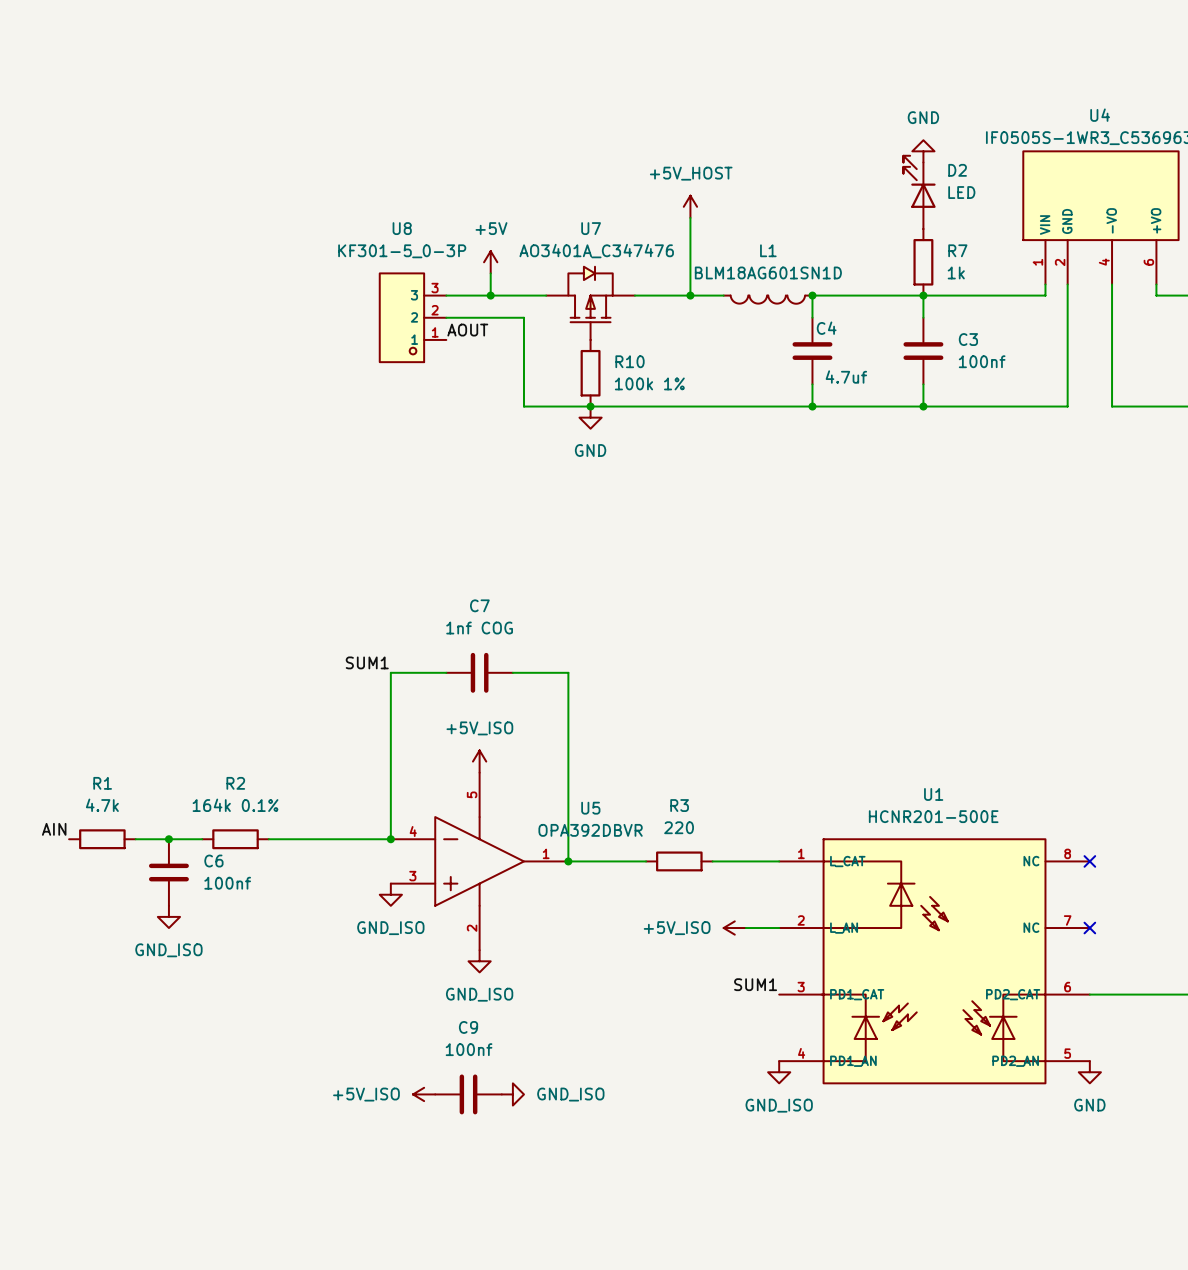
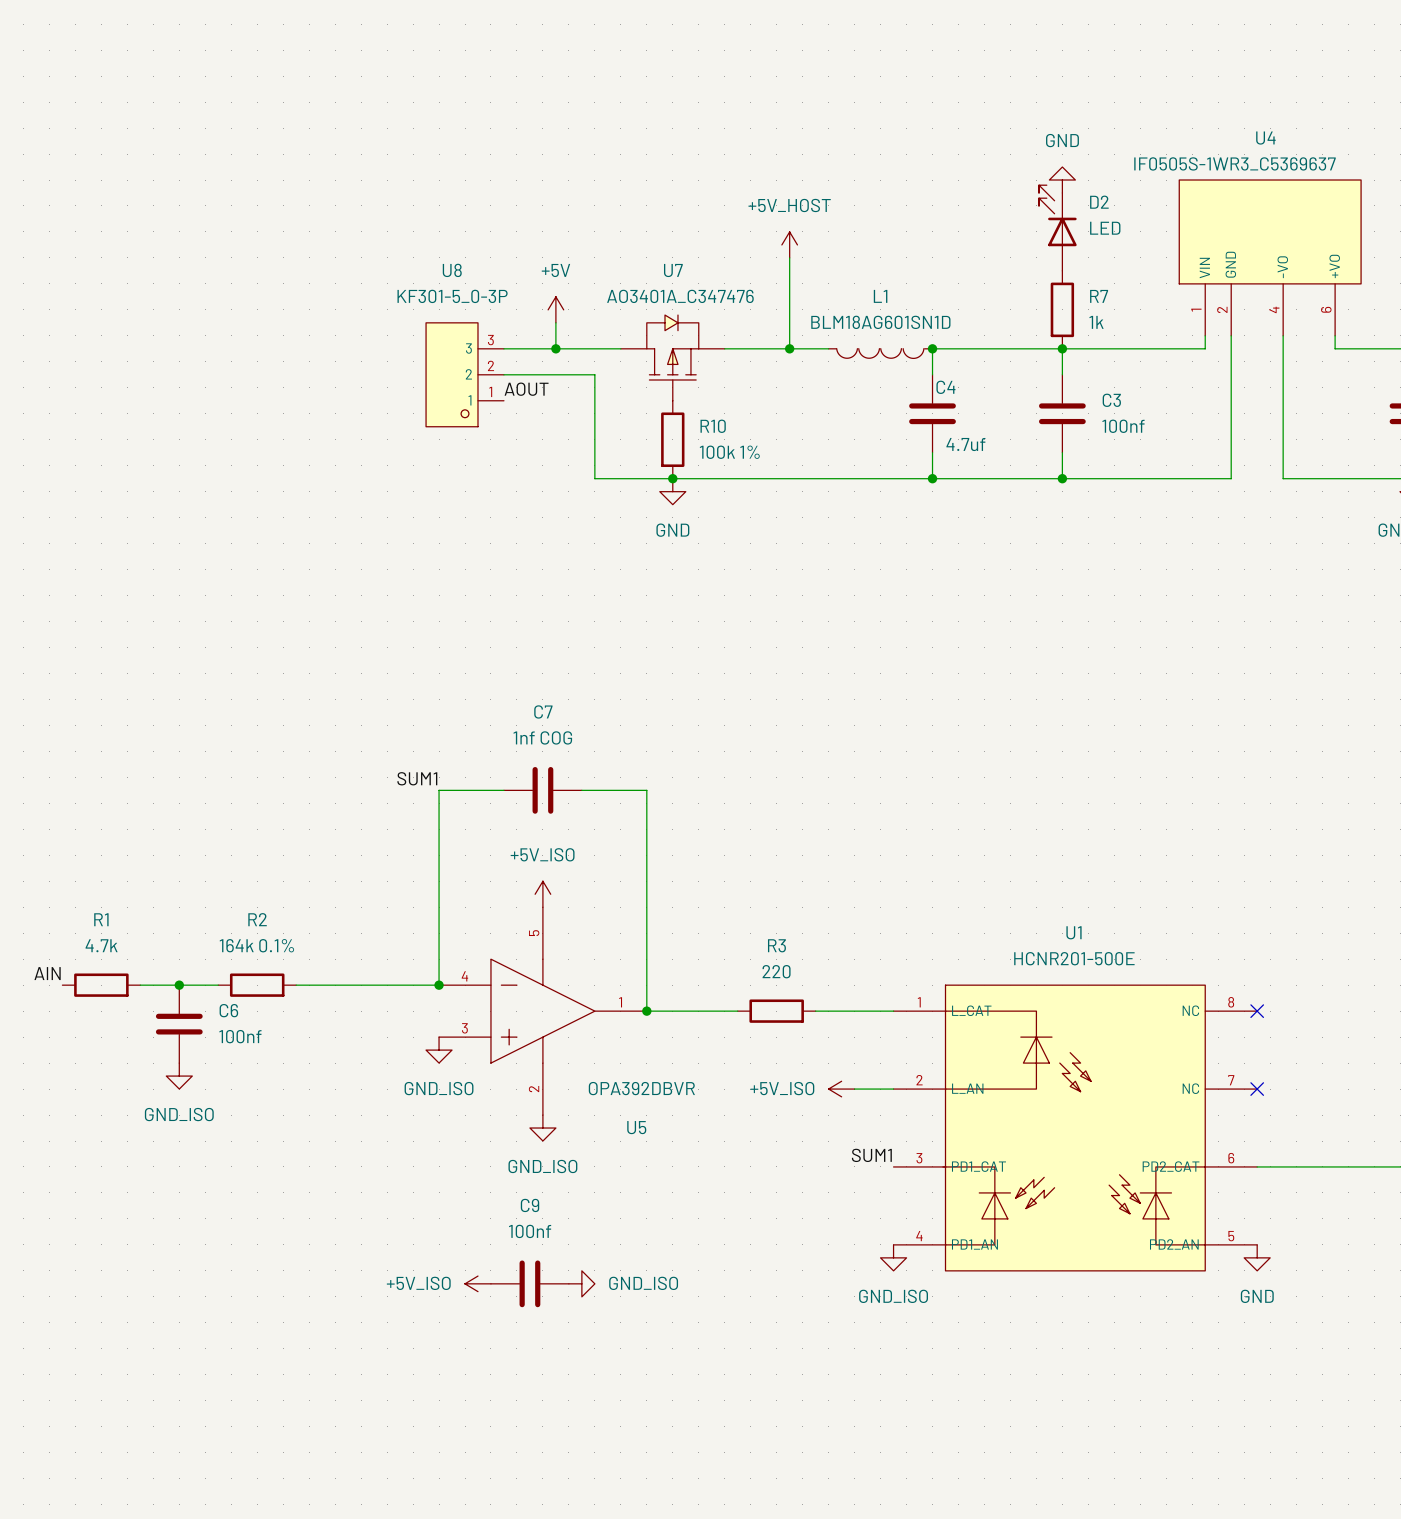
U5 name position: U5 (590, 808) -> U5 (636, 1127)
U5 value position: OPA392DBVR (590, 830) -> OPA392DBVR (641, 1088)

